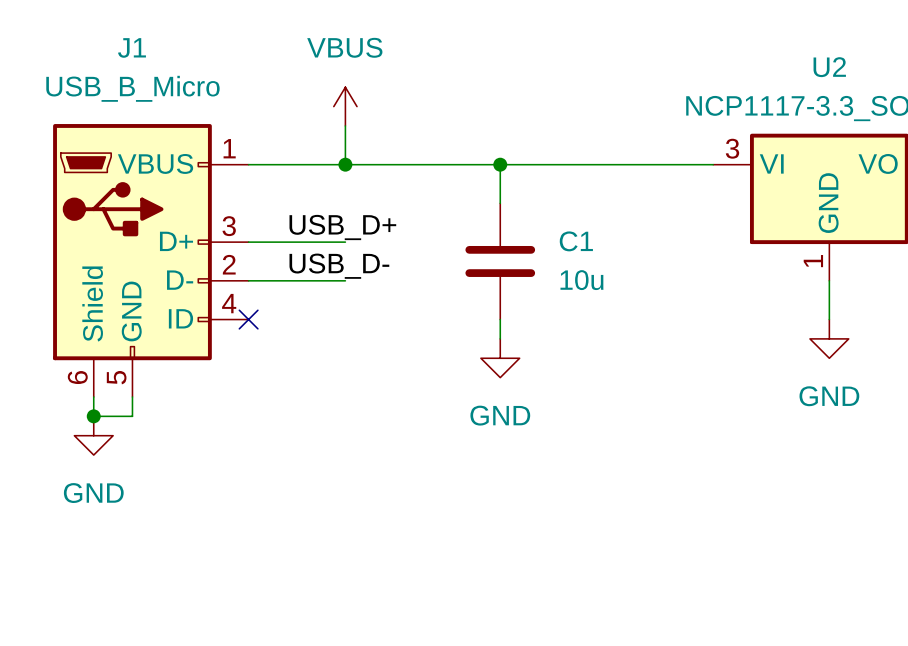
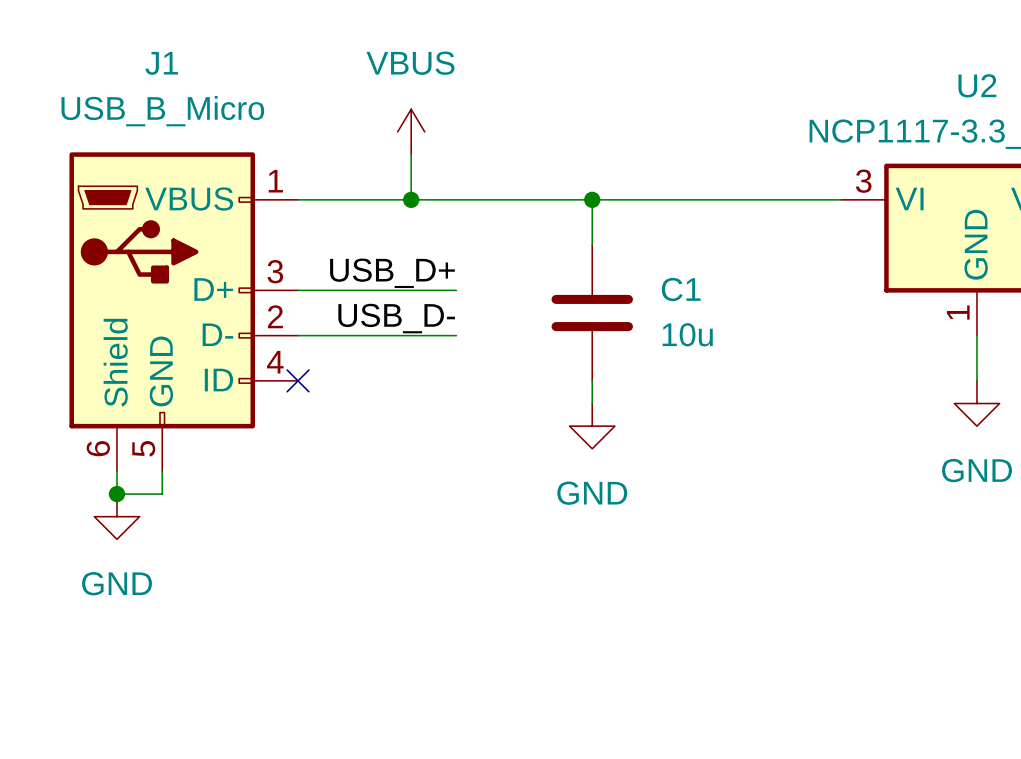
label position: USB_D+ (342, 227) -> USB_D+ (392, 273)
wire: none -> (411, 290) (456, 290)
label position: USB_D- (339, 266) -> USB_D- (396, 318)
wire: none -> (411, 335) (456, 335)

